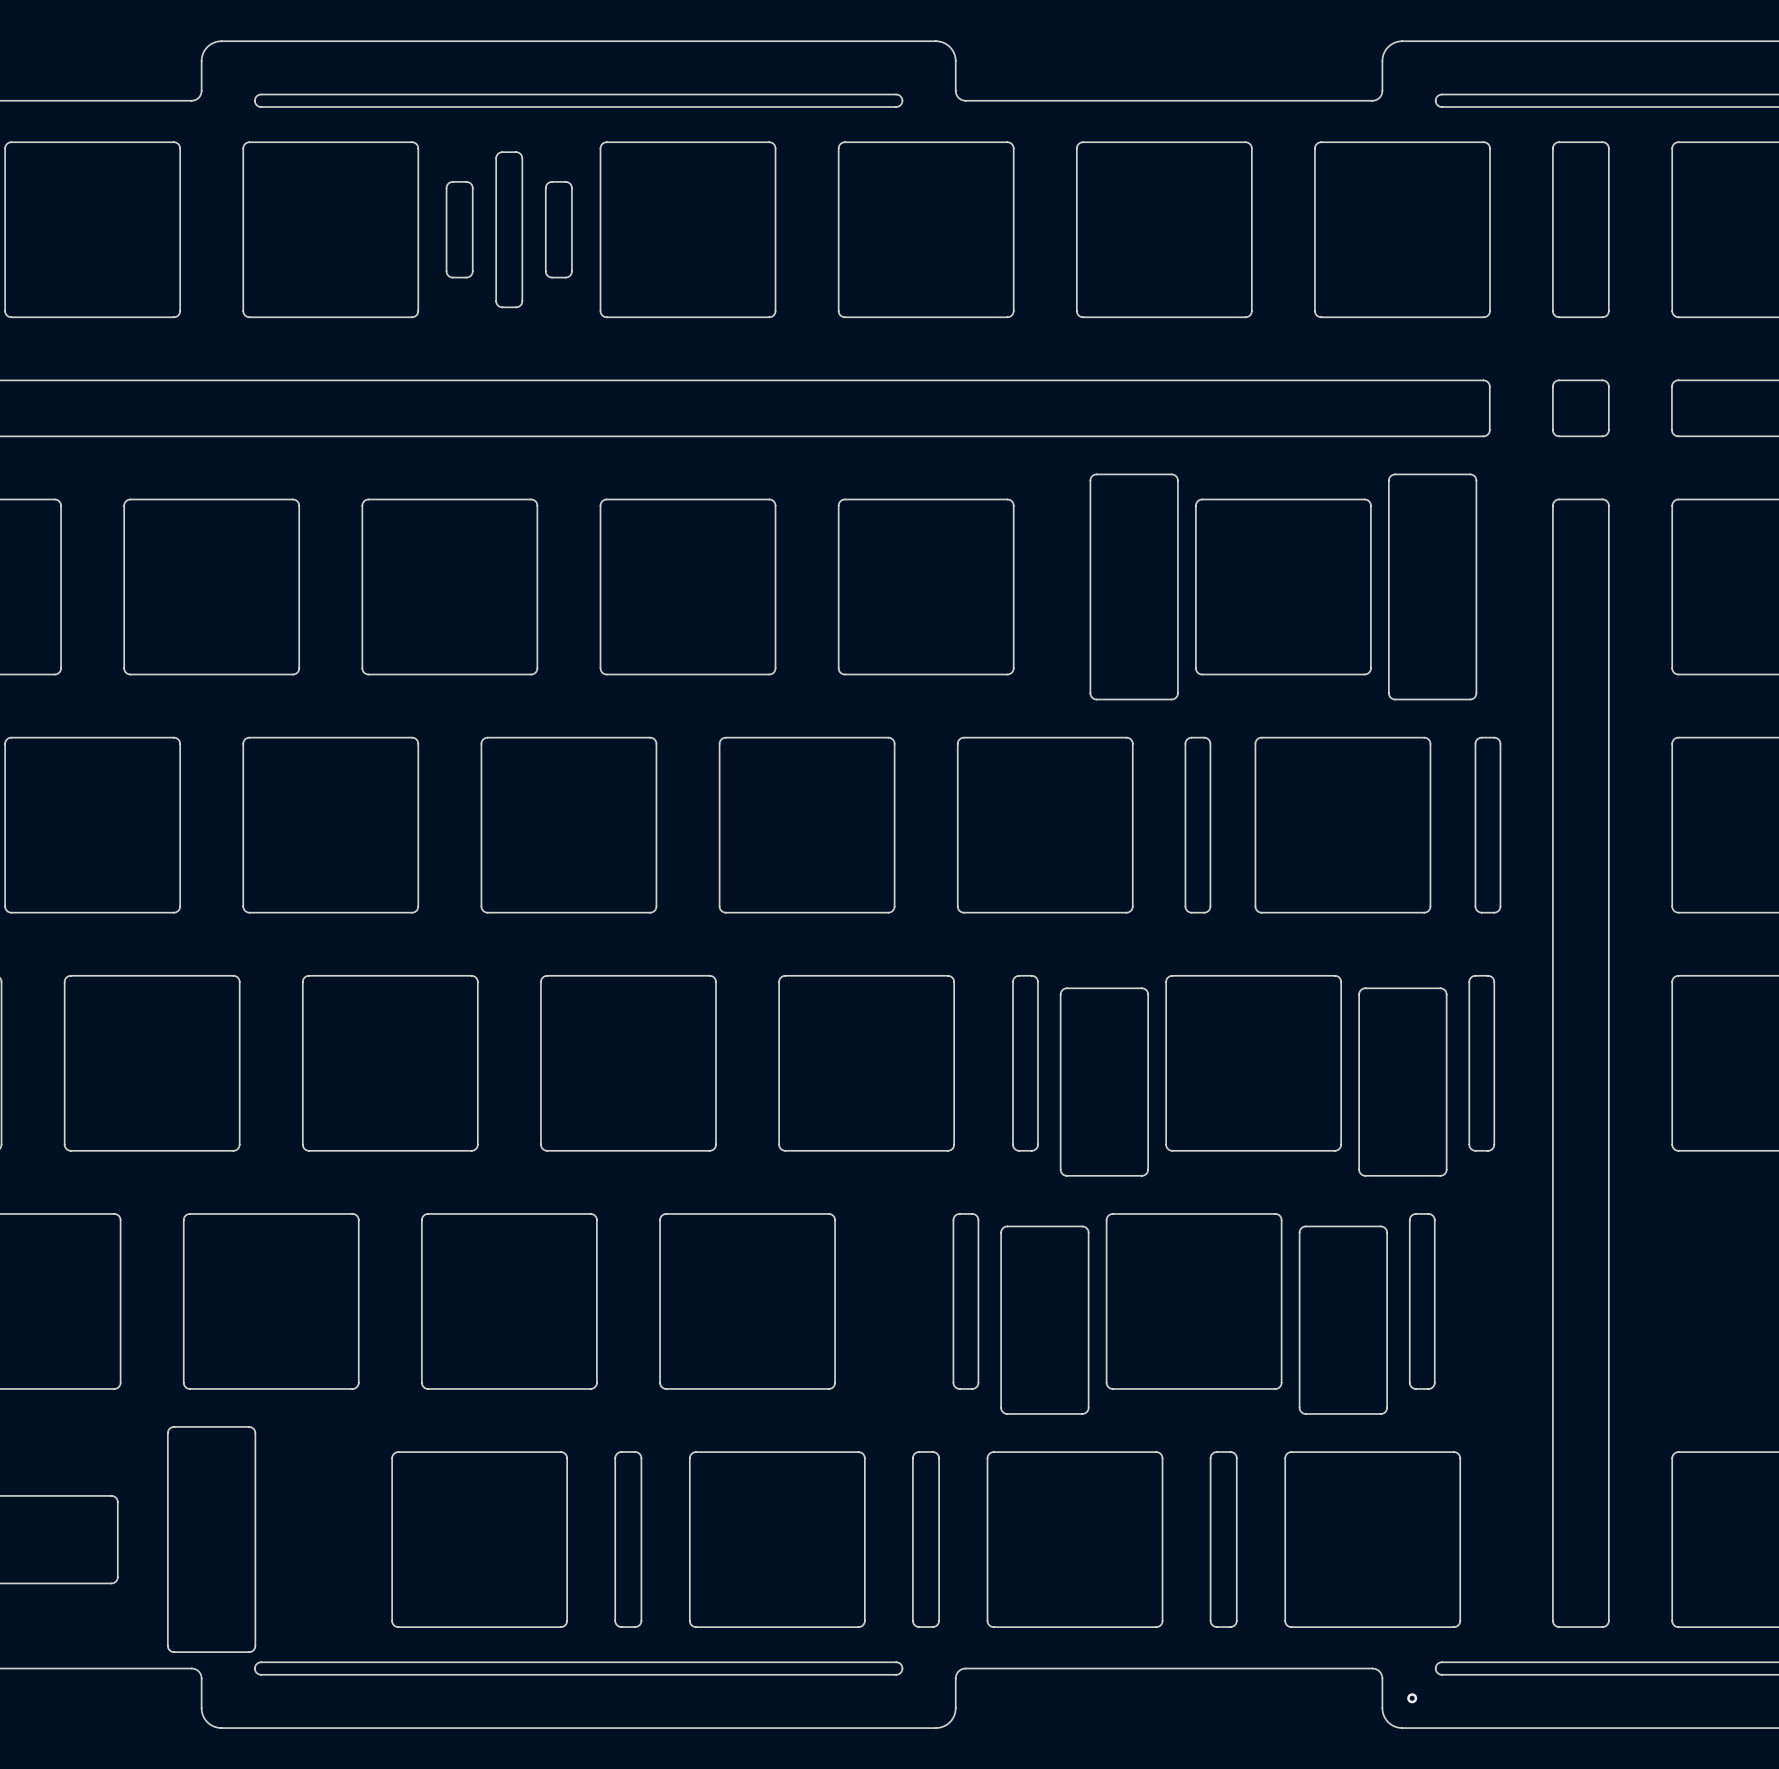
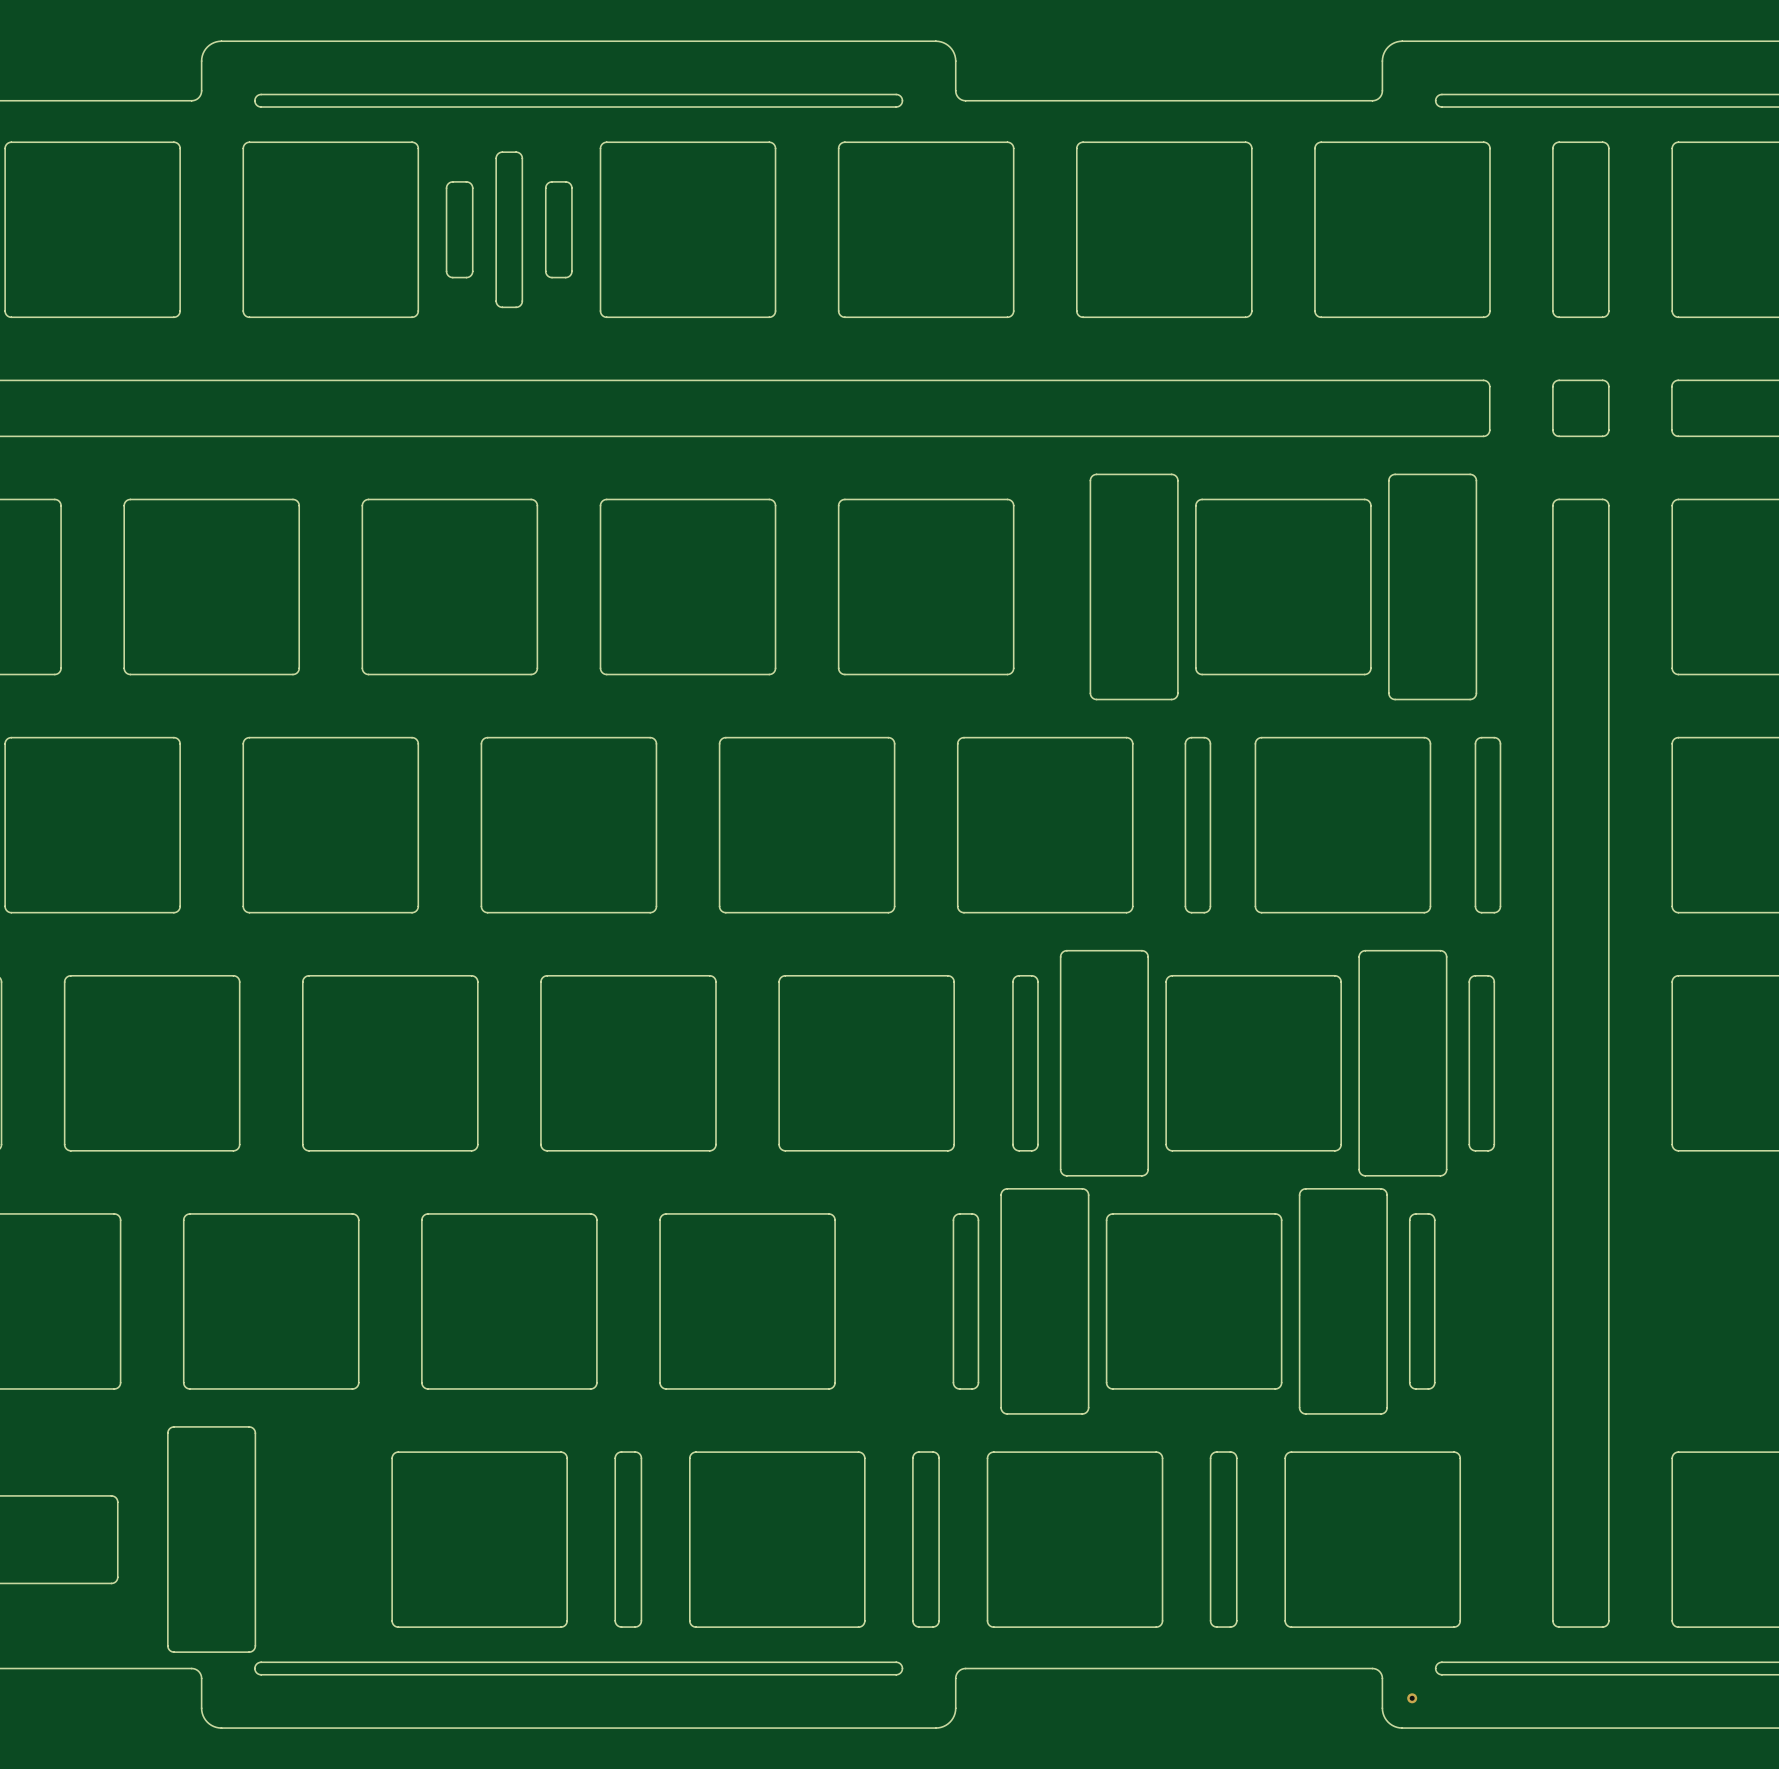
board edge: (1060, 994) (1062, 990) (1066, 988) (1142, 988) (1146, 990) (1148, 994) -> (1060, 994) (1060, 956) (1062, 952) (1066, 950) (1145, 951) (1148, 956) (1148, 994)
board edge: (1359, 994) (1360, 990) (1365, 988) (1441, 988) (1444, 990) (1446, 994) -> (1359, 994) (1359, 956) (1360, 952) (1365, 950) (1443, 951) (1446, 956) (1446, 994)
board edge: (1001, 1232) (1002, 1228) (1007, 1226) (1083, 1226) (1086, 1228) (1088, 1232) -> (1001, 1232) (1001, 1194) (1002, 1190) (1007, 1188) (1085, 1189) (1088, 1194) (1088, 1232)
board edge: (1299, 1232) (1301, 1228) (1305, 1226) (1381, 1226) (1385, 1228) (1387, 1232) -> (1299, 1232) (1299, 1194) (1301, 1190) (1305, 1188) (1383, 1189) (1387, 1194) (1387, 1232)

